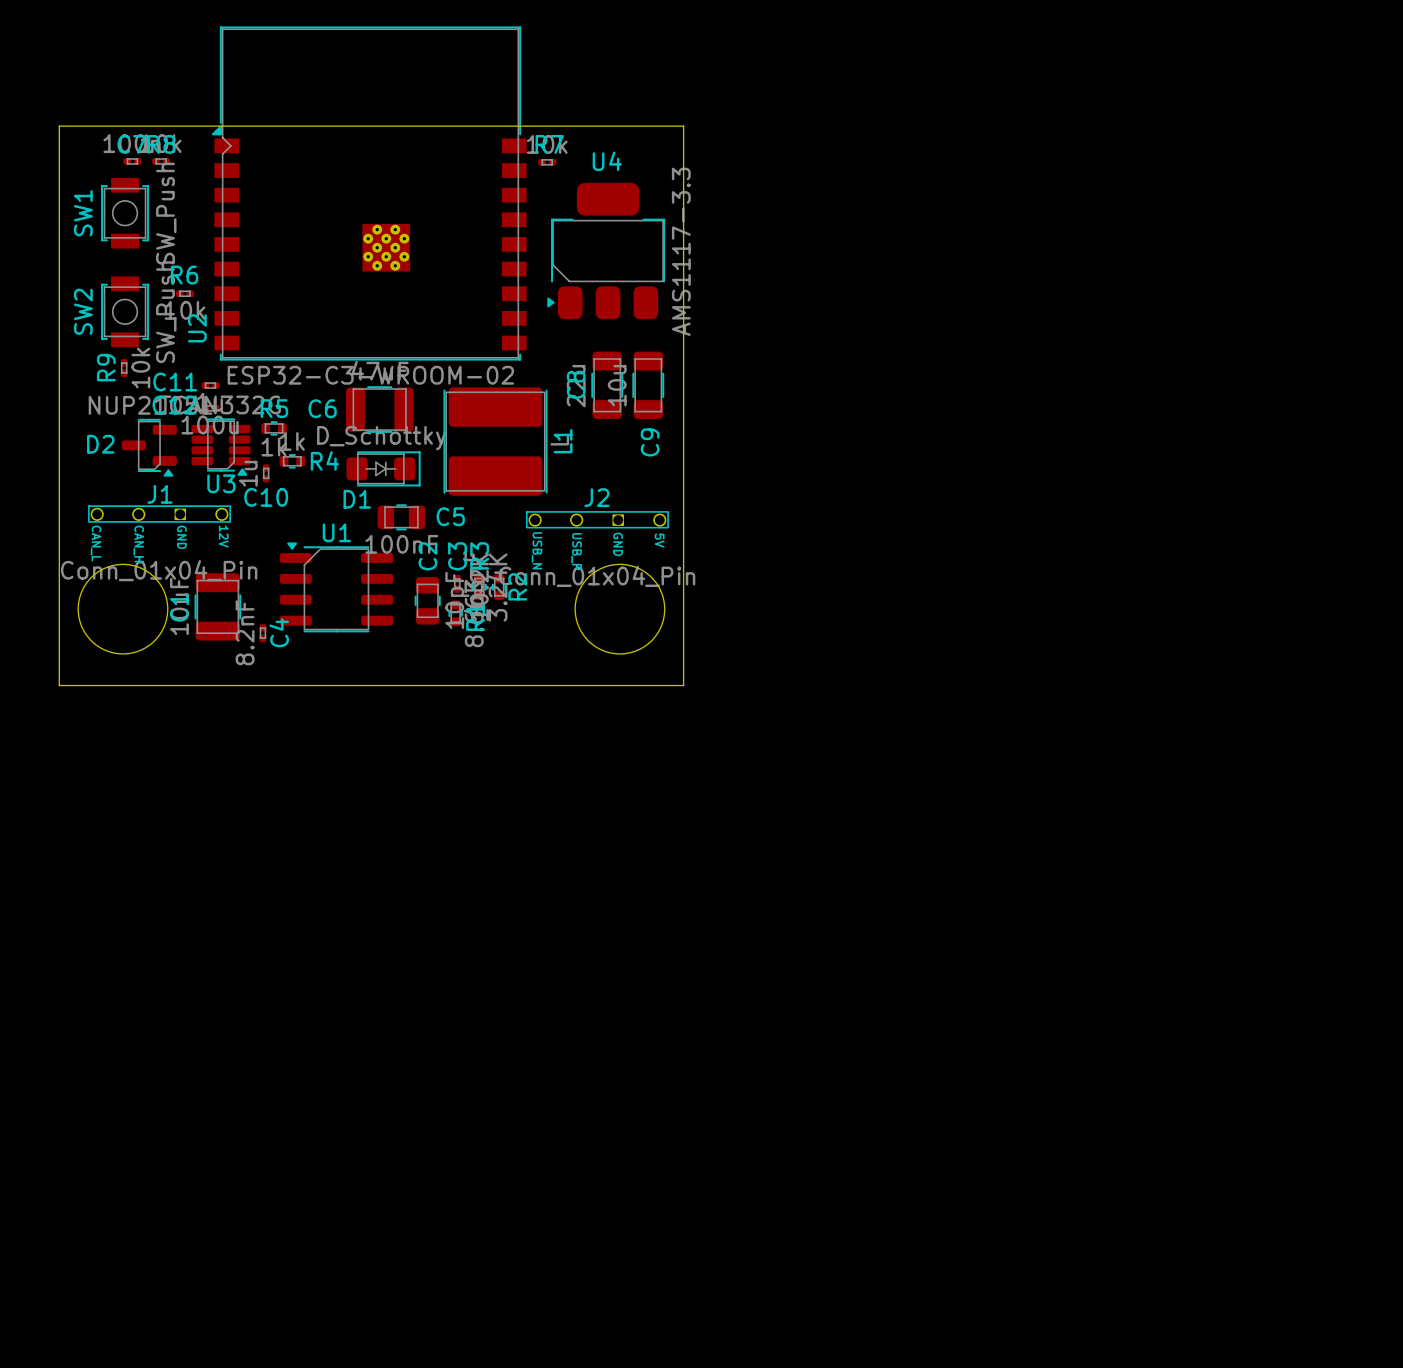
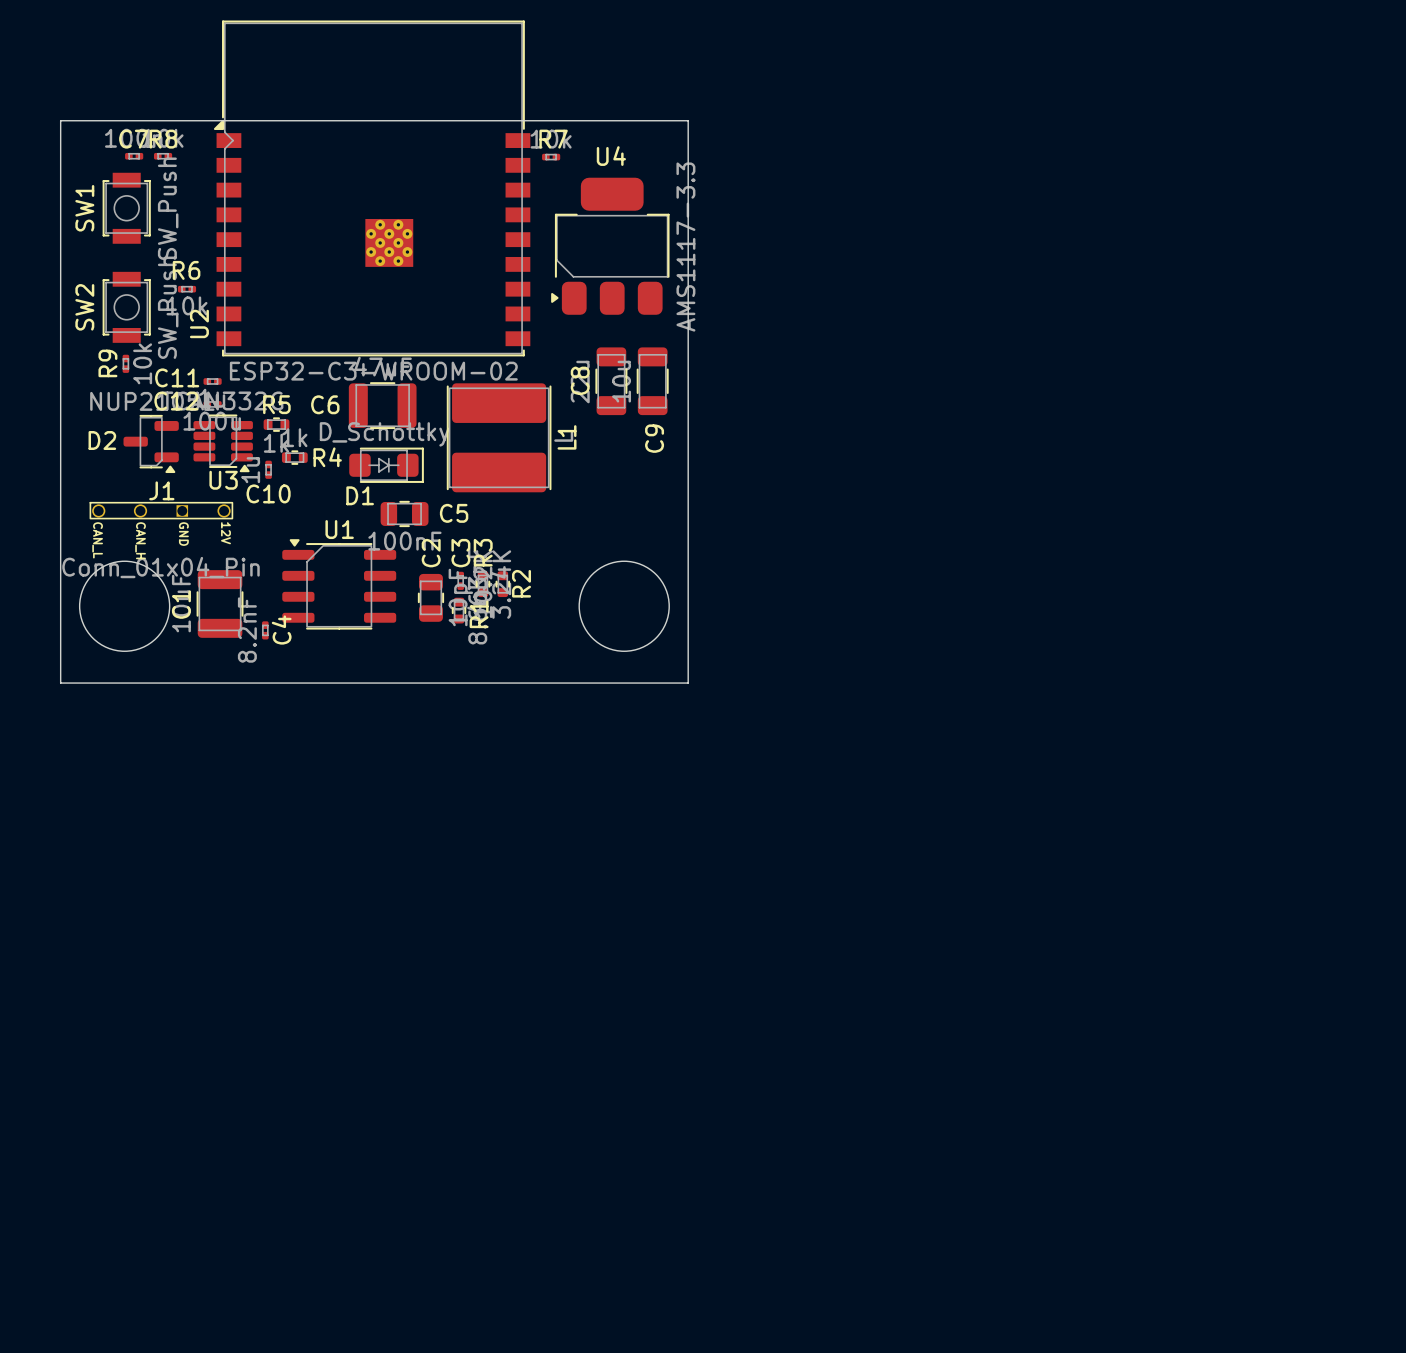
J2: Conn_01x04_Pin (597, 519) -> none

